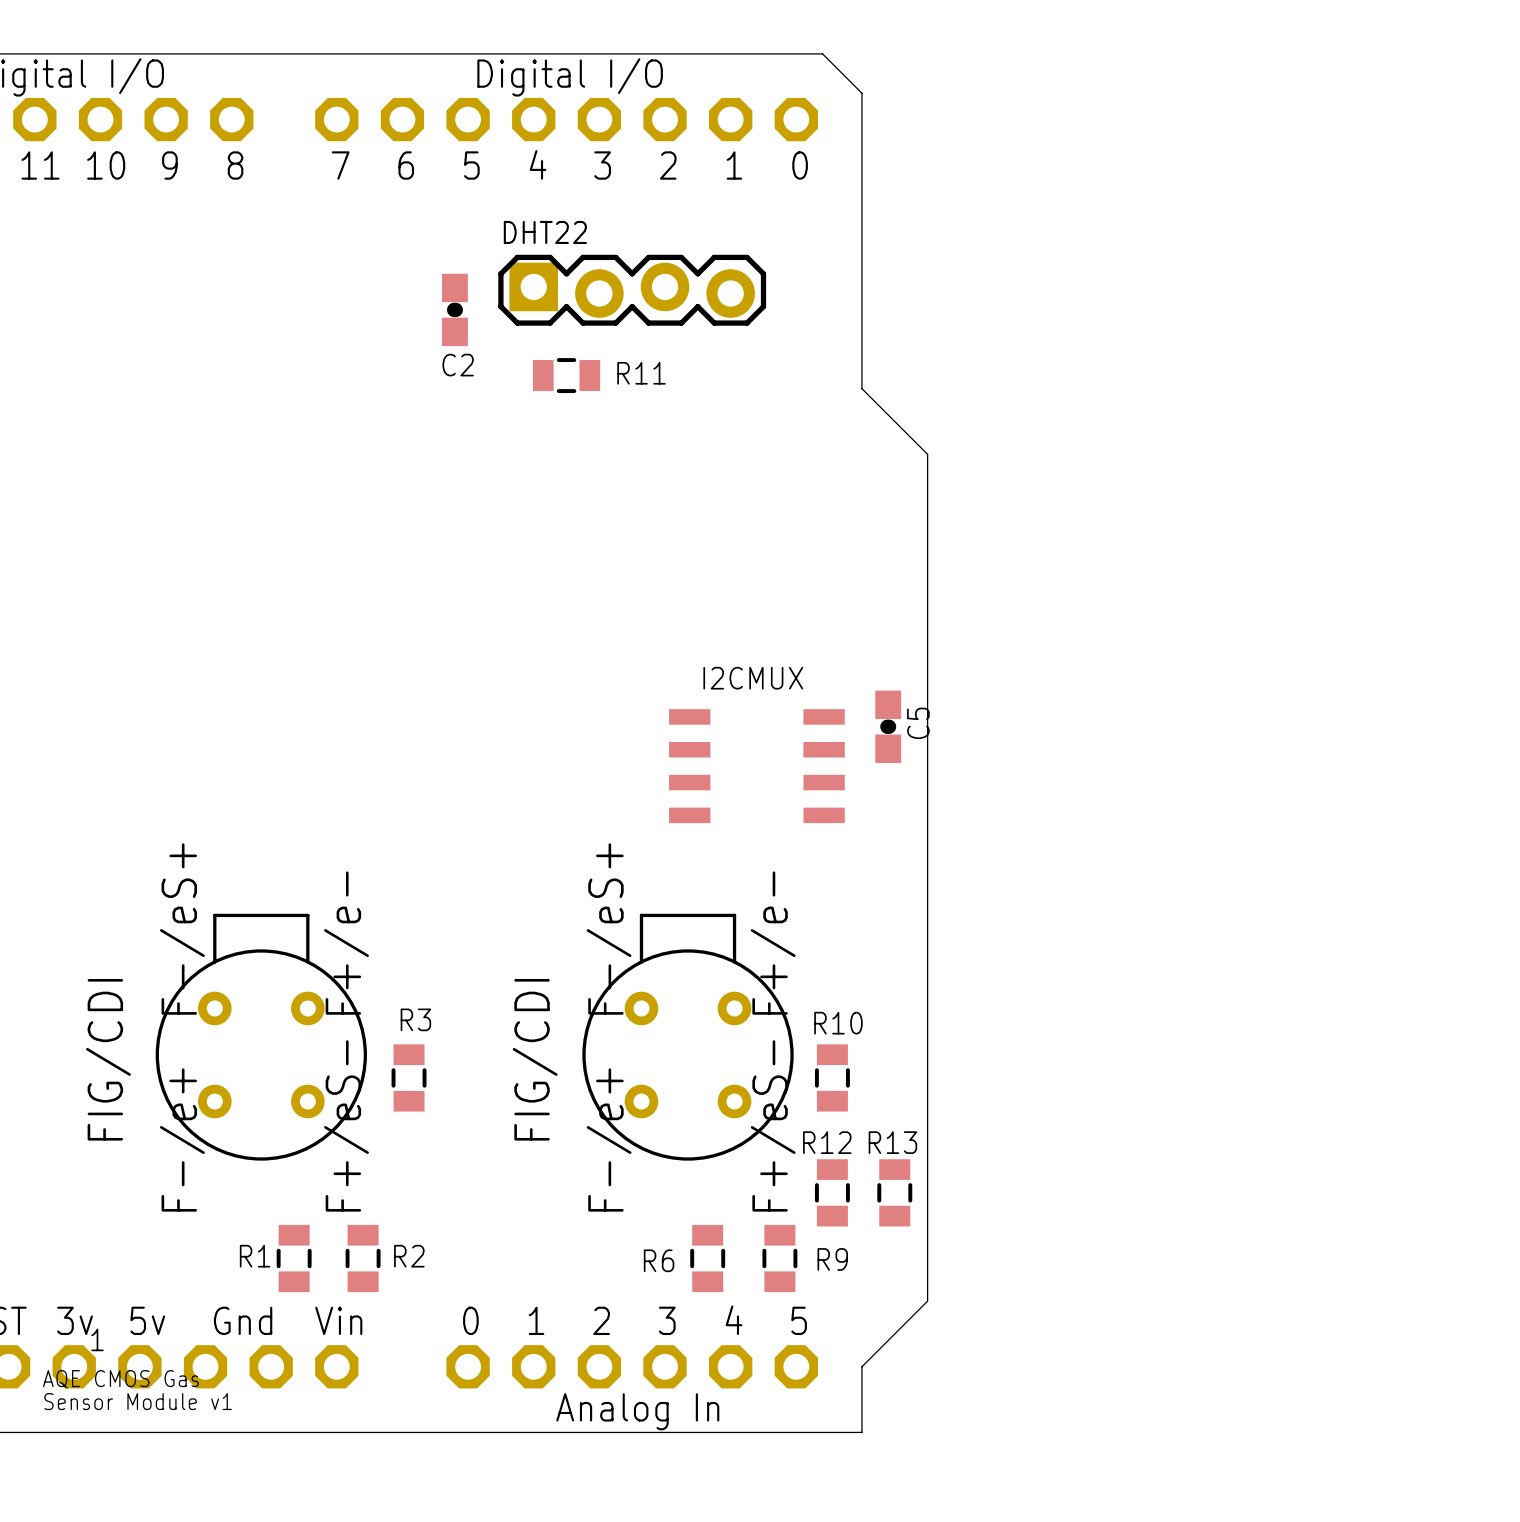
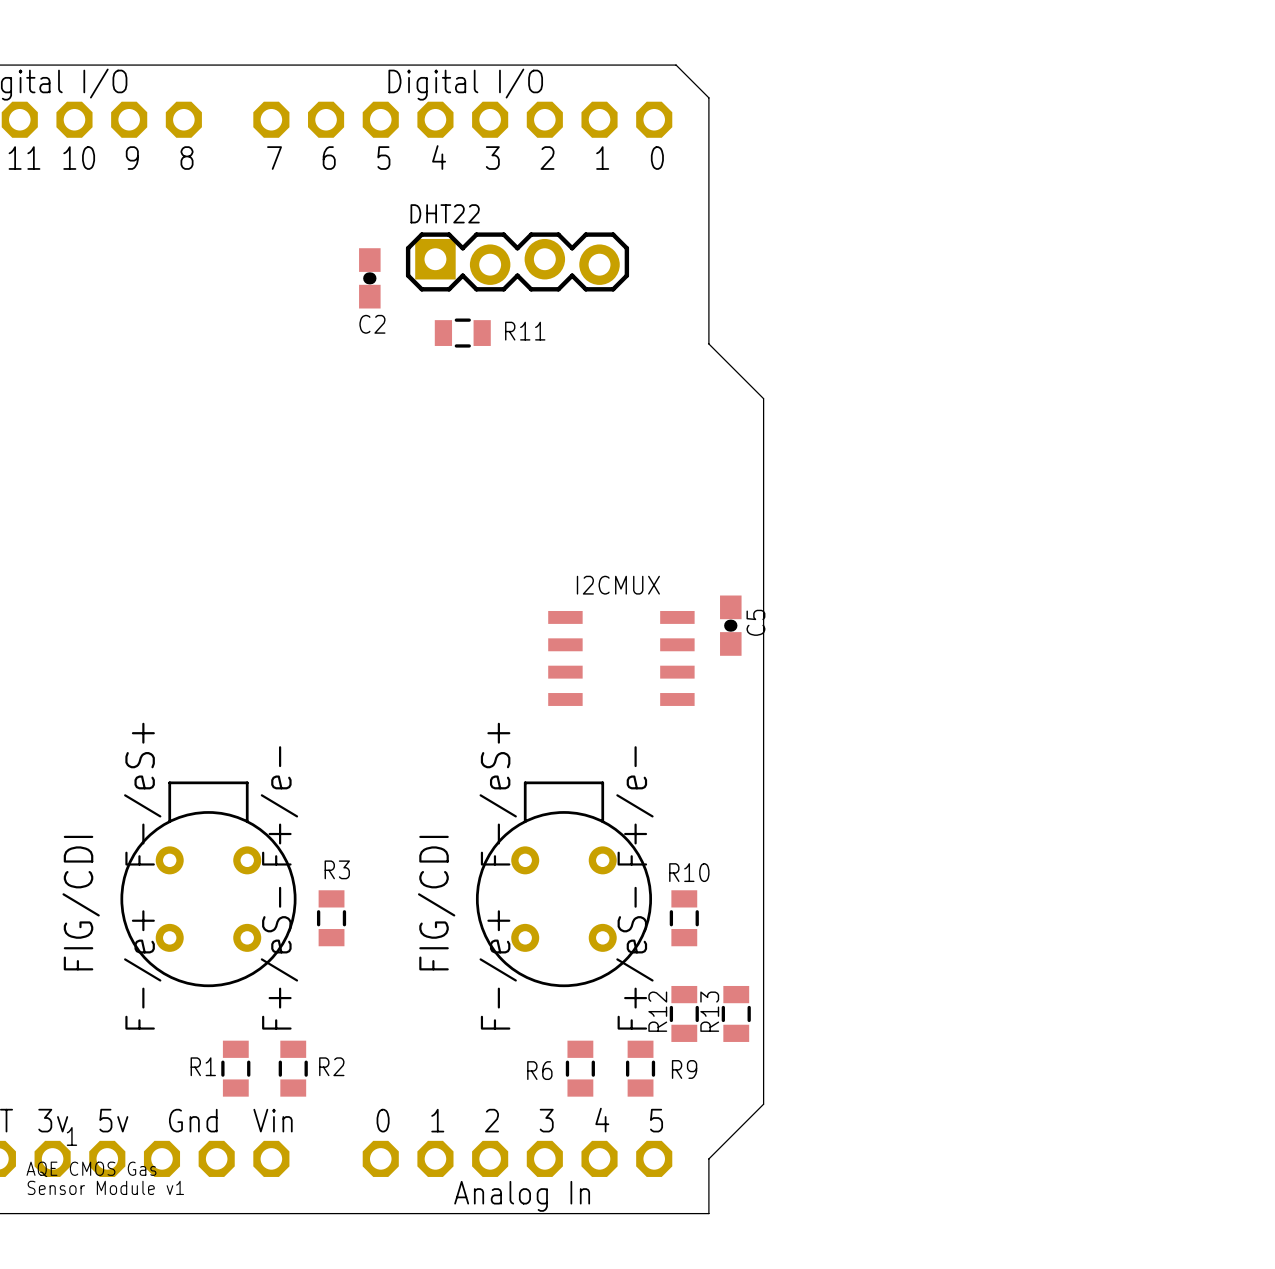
R12 name rotation: 0° (827, 1142) -> 90° counterclockwise (657, 1011)
R13 name rotation: 0° (892, 1142) -> 90° counterclockwise (709, 1011)

